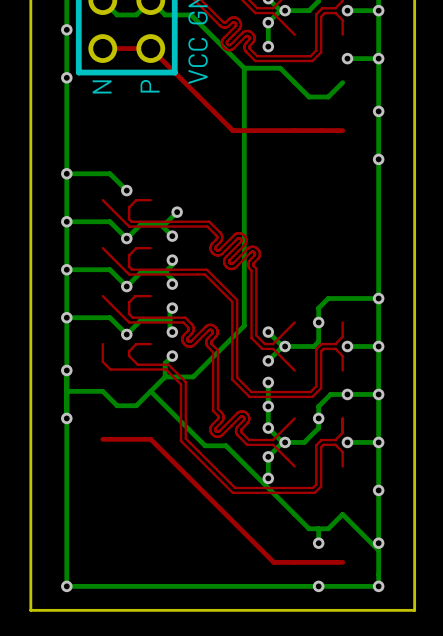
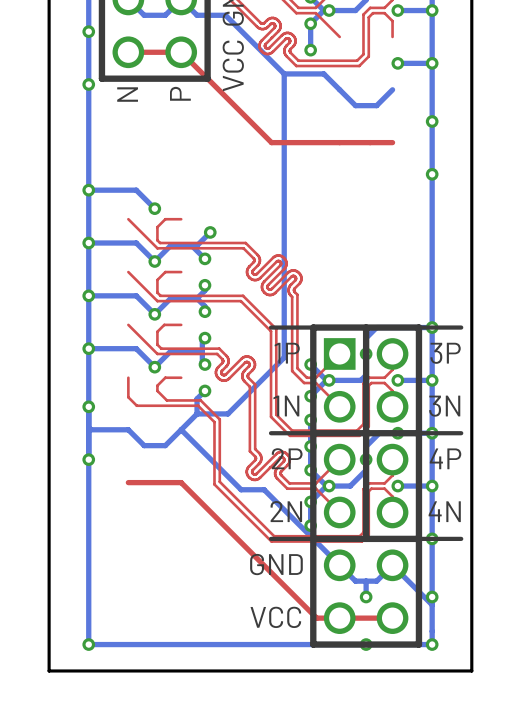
part: none -> (366, 486)

